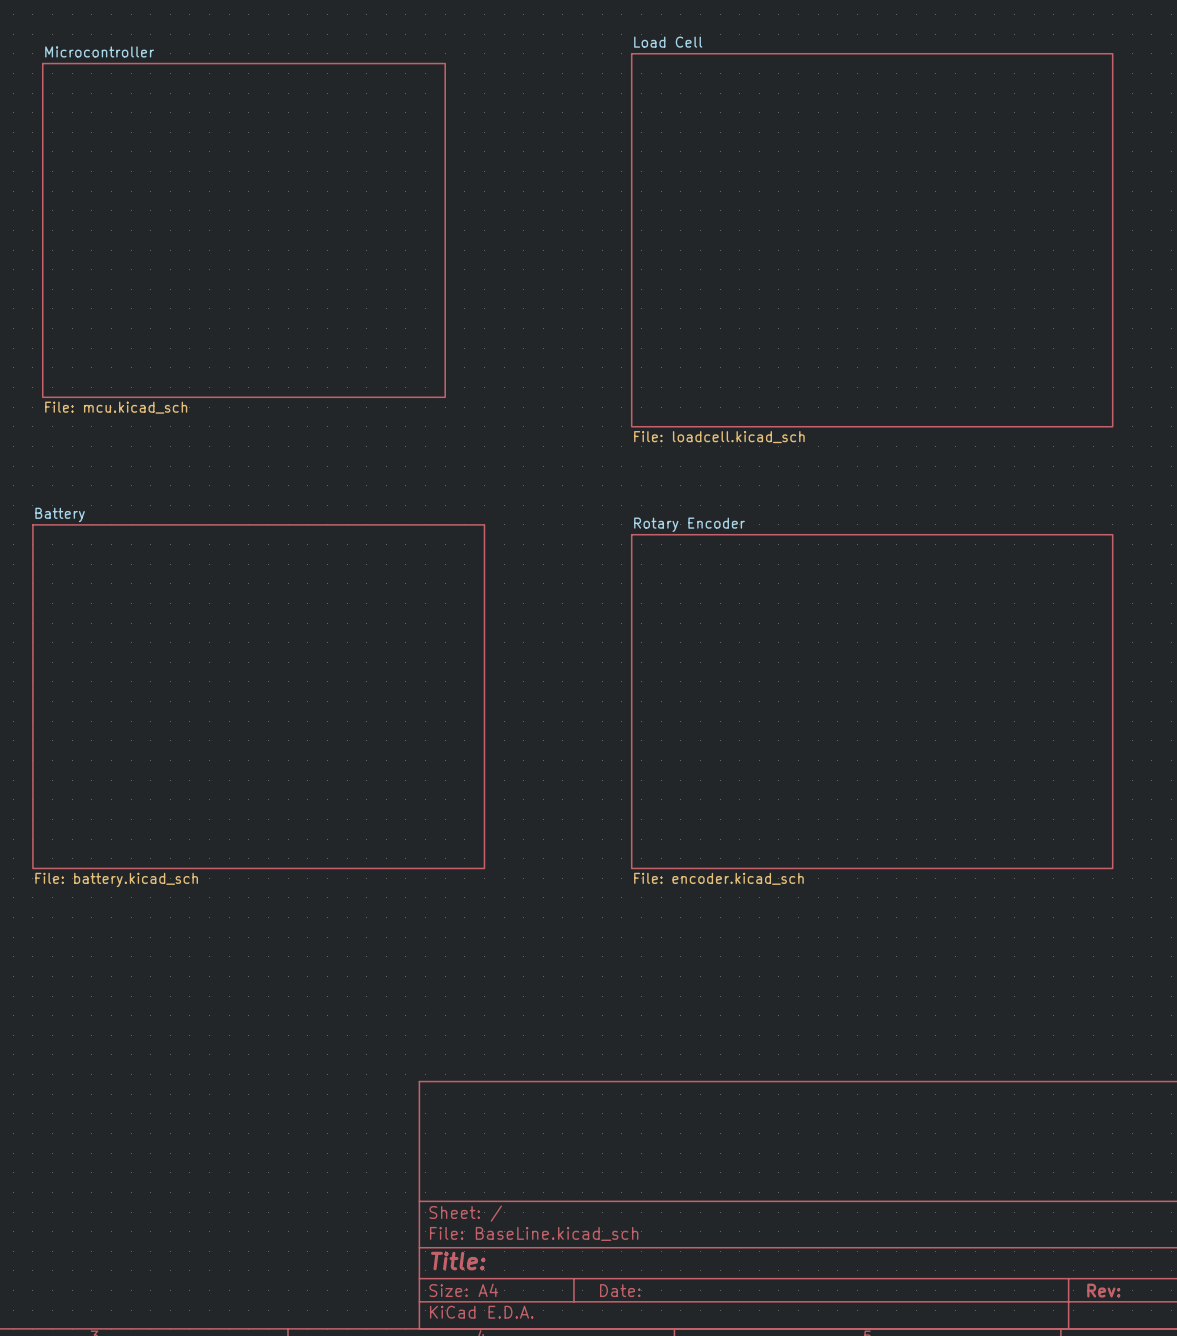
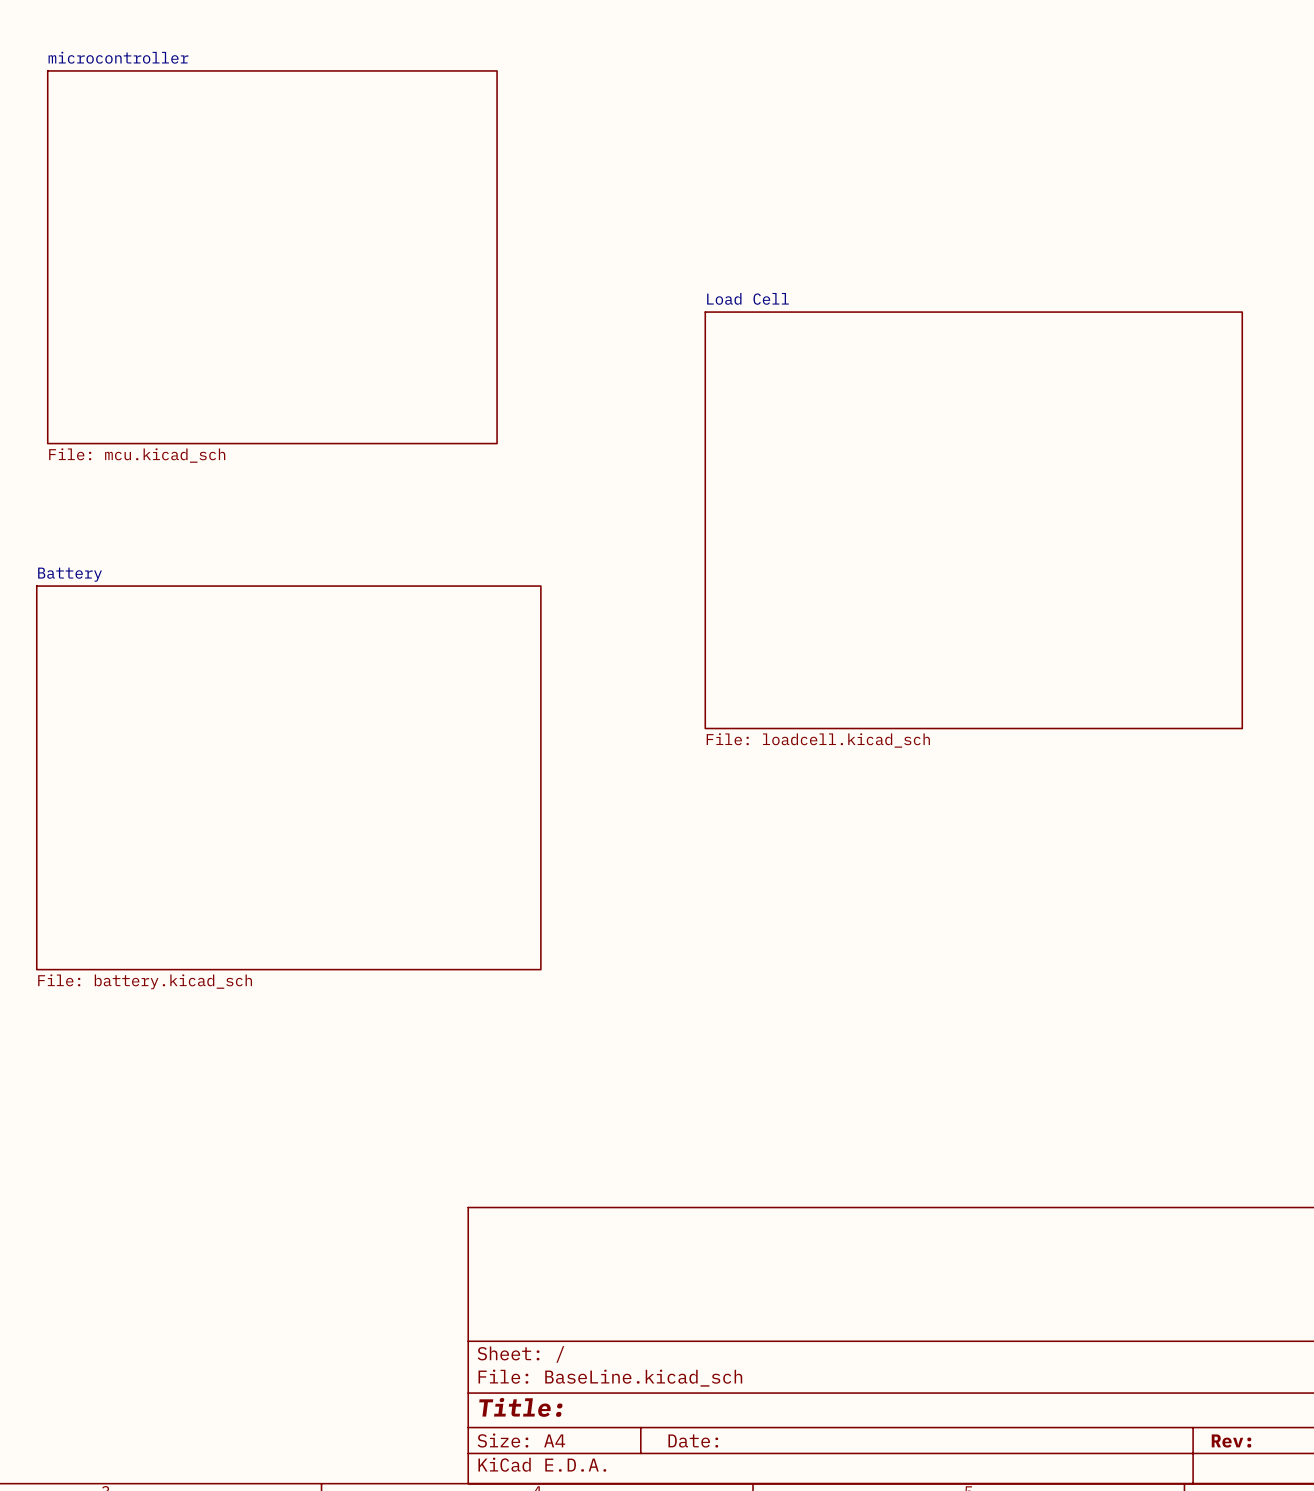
sheet Microcontroller name: Microcontroller (99, 51) -> microcontroller (118, 57)
sheet Load Cell: File: loadcell.kicad_sch (872, 240) -> none
sheet Load Cell: none -> File: loadcell.kicad_sch (973, 520)
sheet Rotary Encoder: File: encoder.kicad_sch (872, 701) -> none

